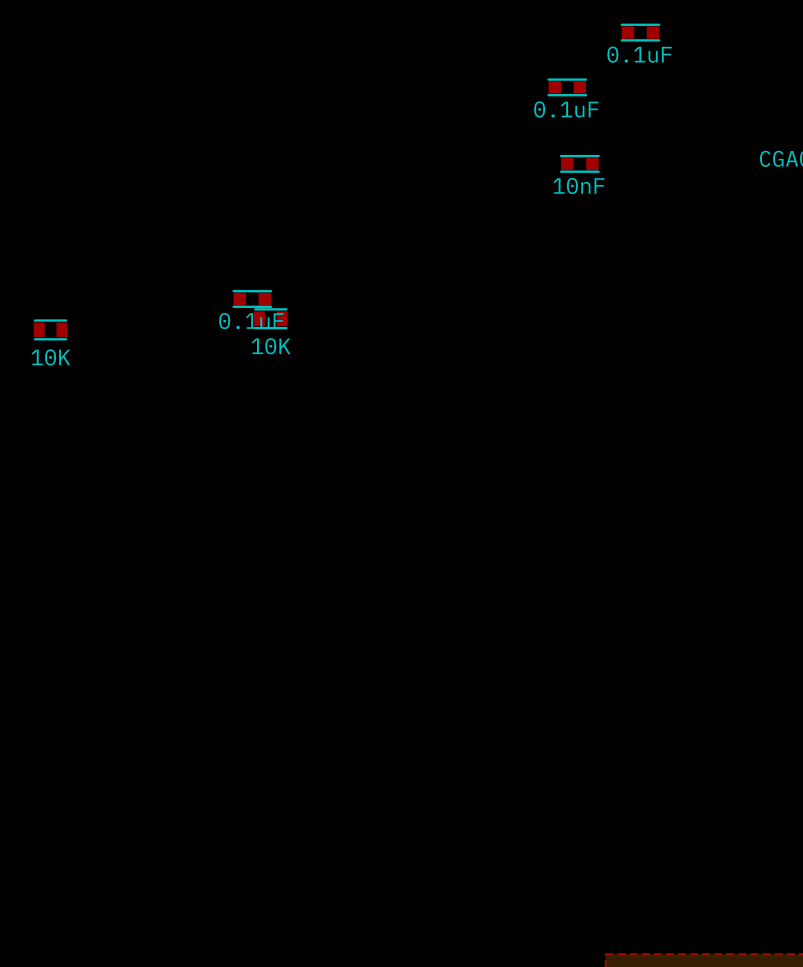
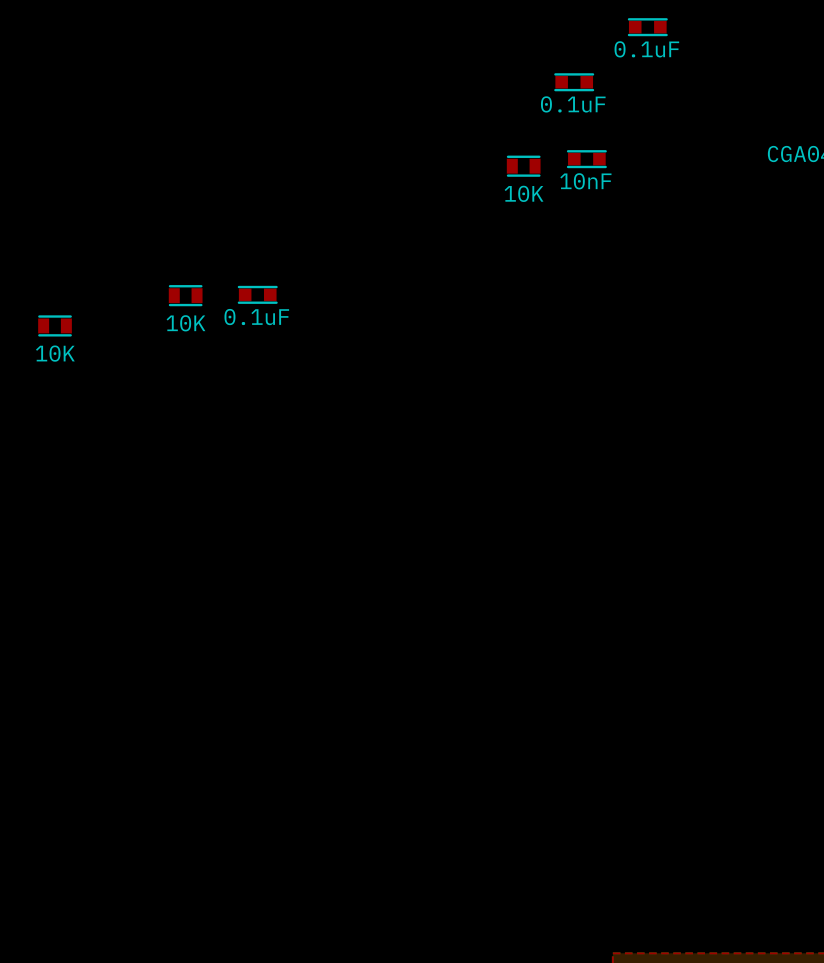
part: none -> 10K (523, 166)
part position: (270, 318) -> (185, 295)

